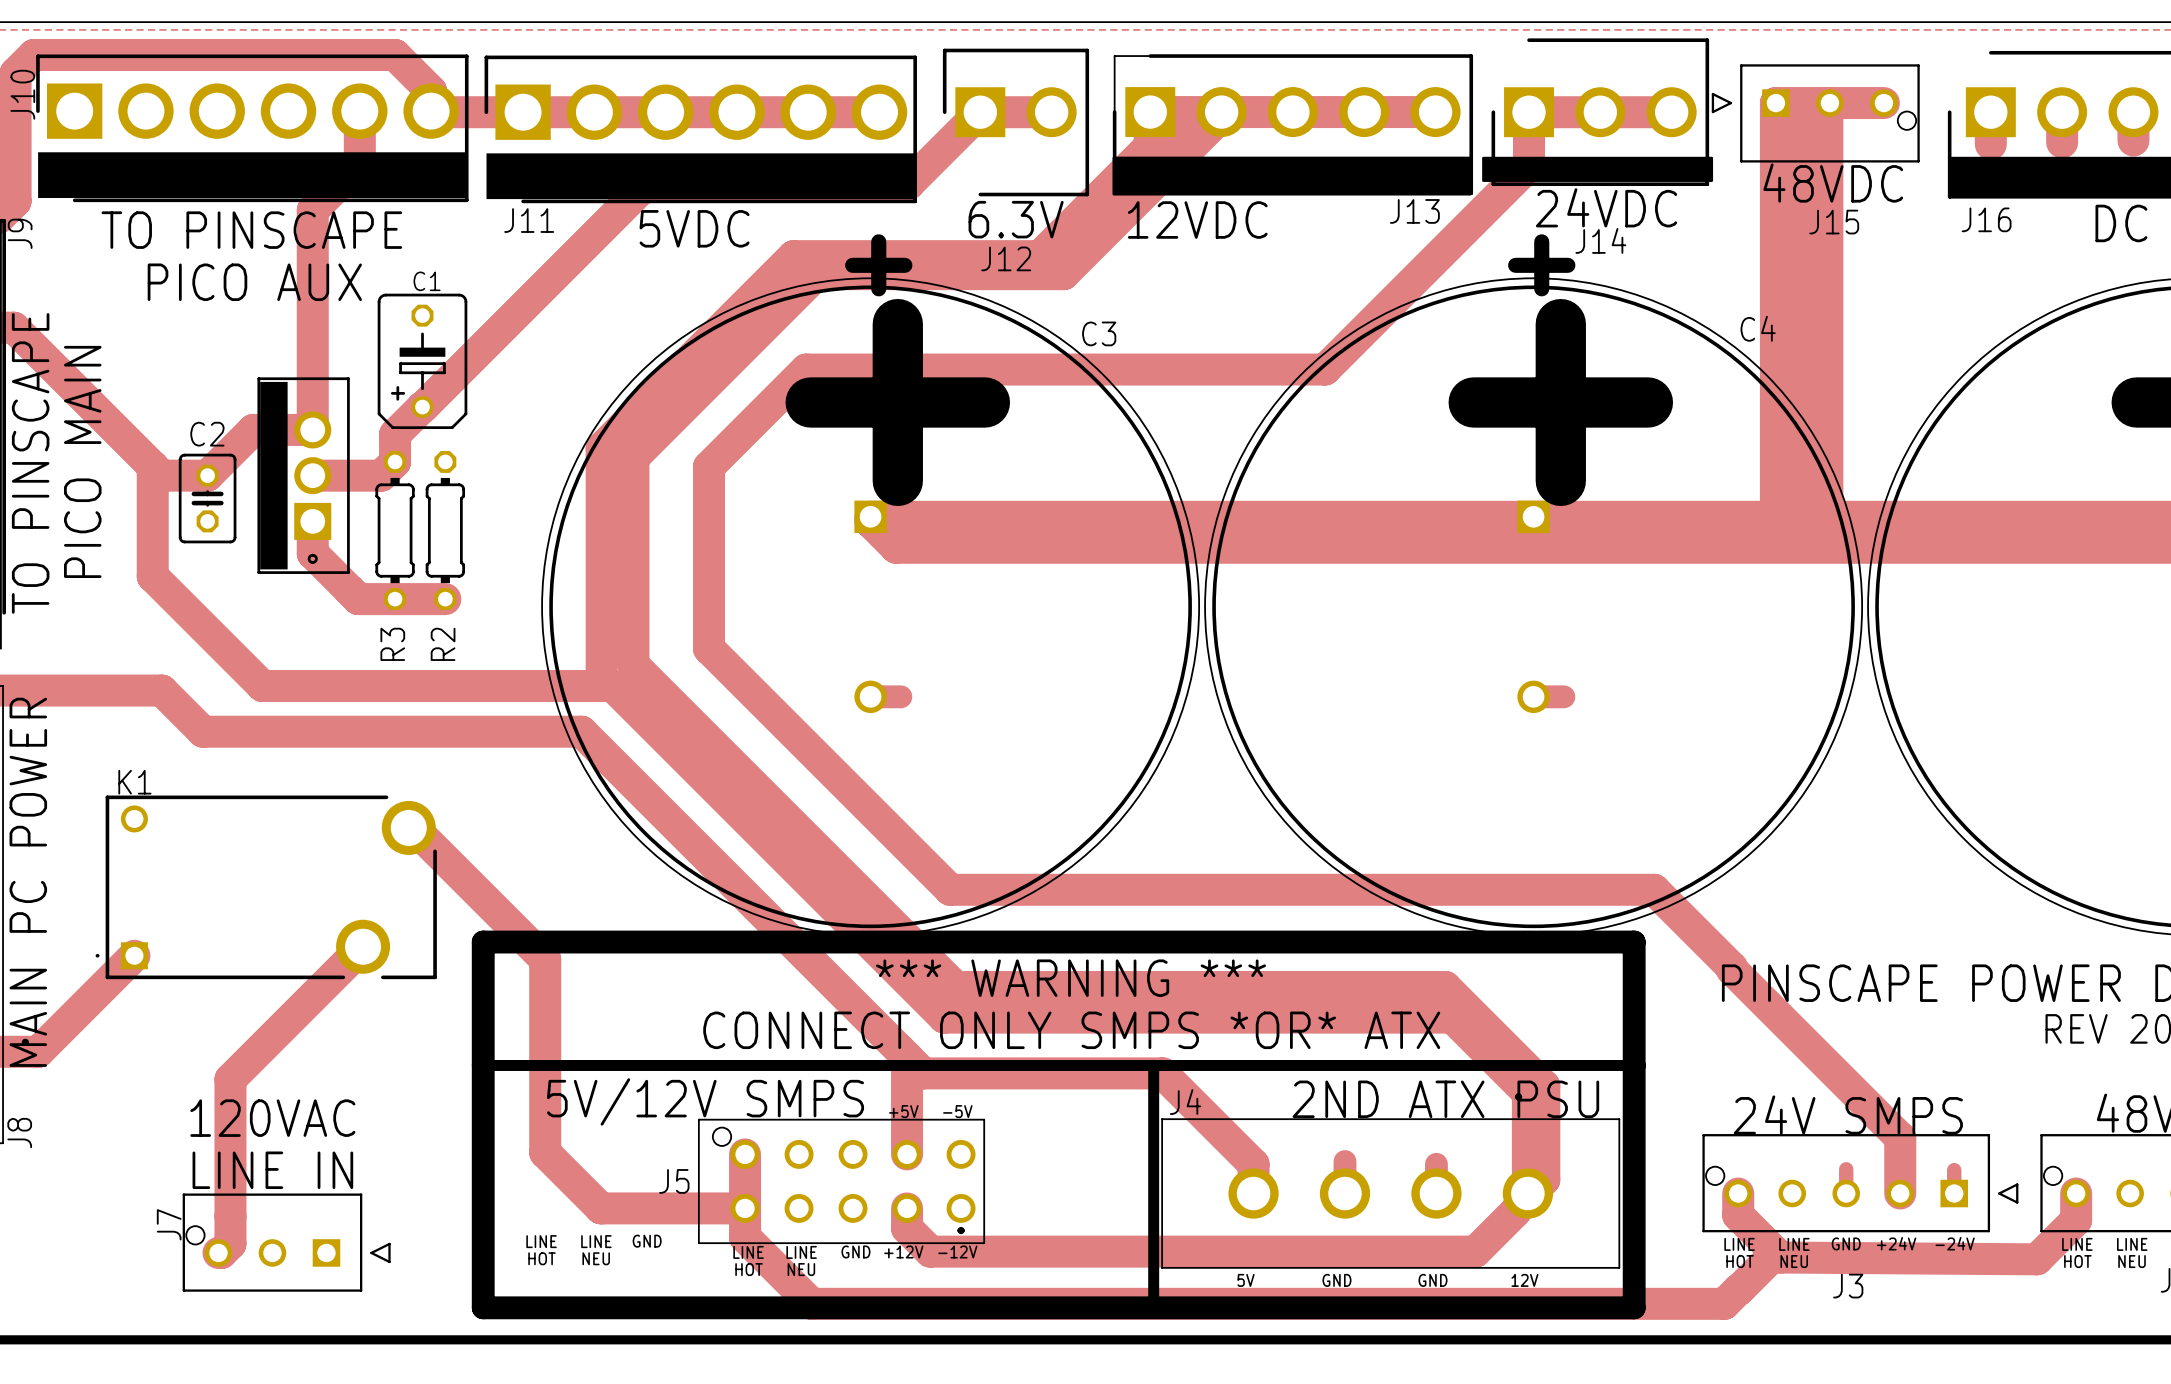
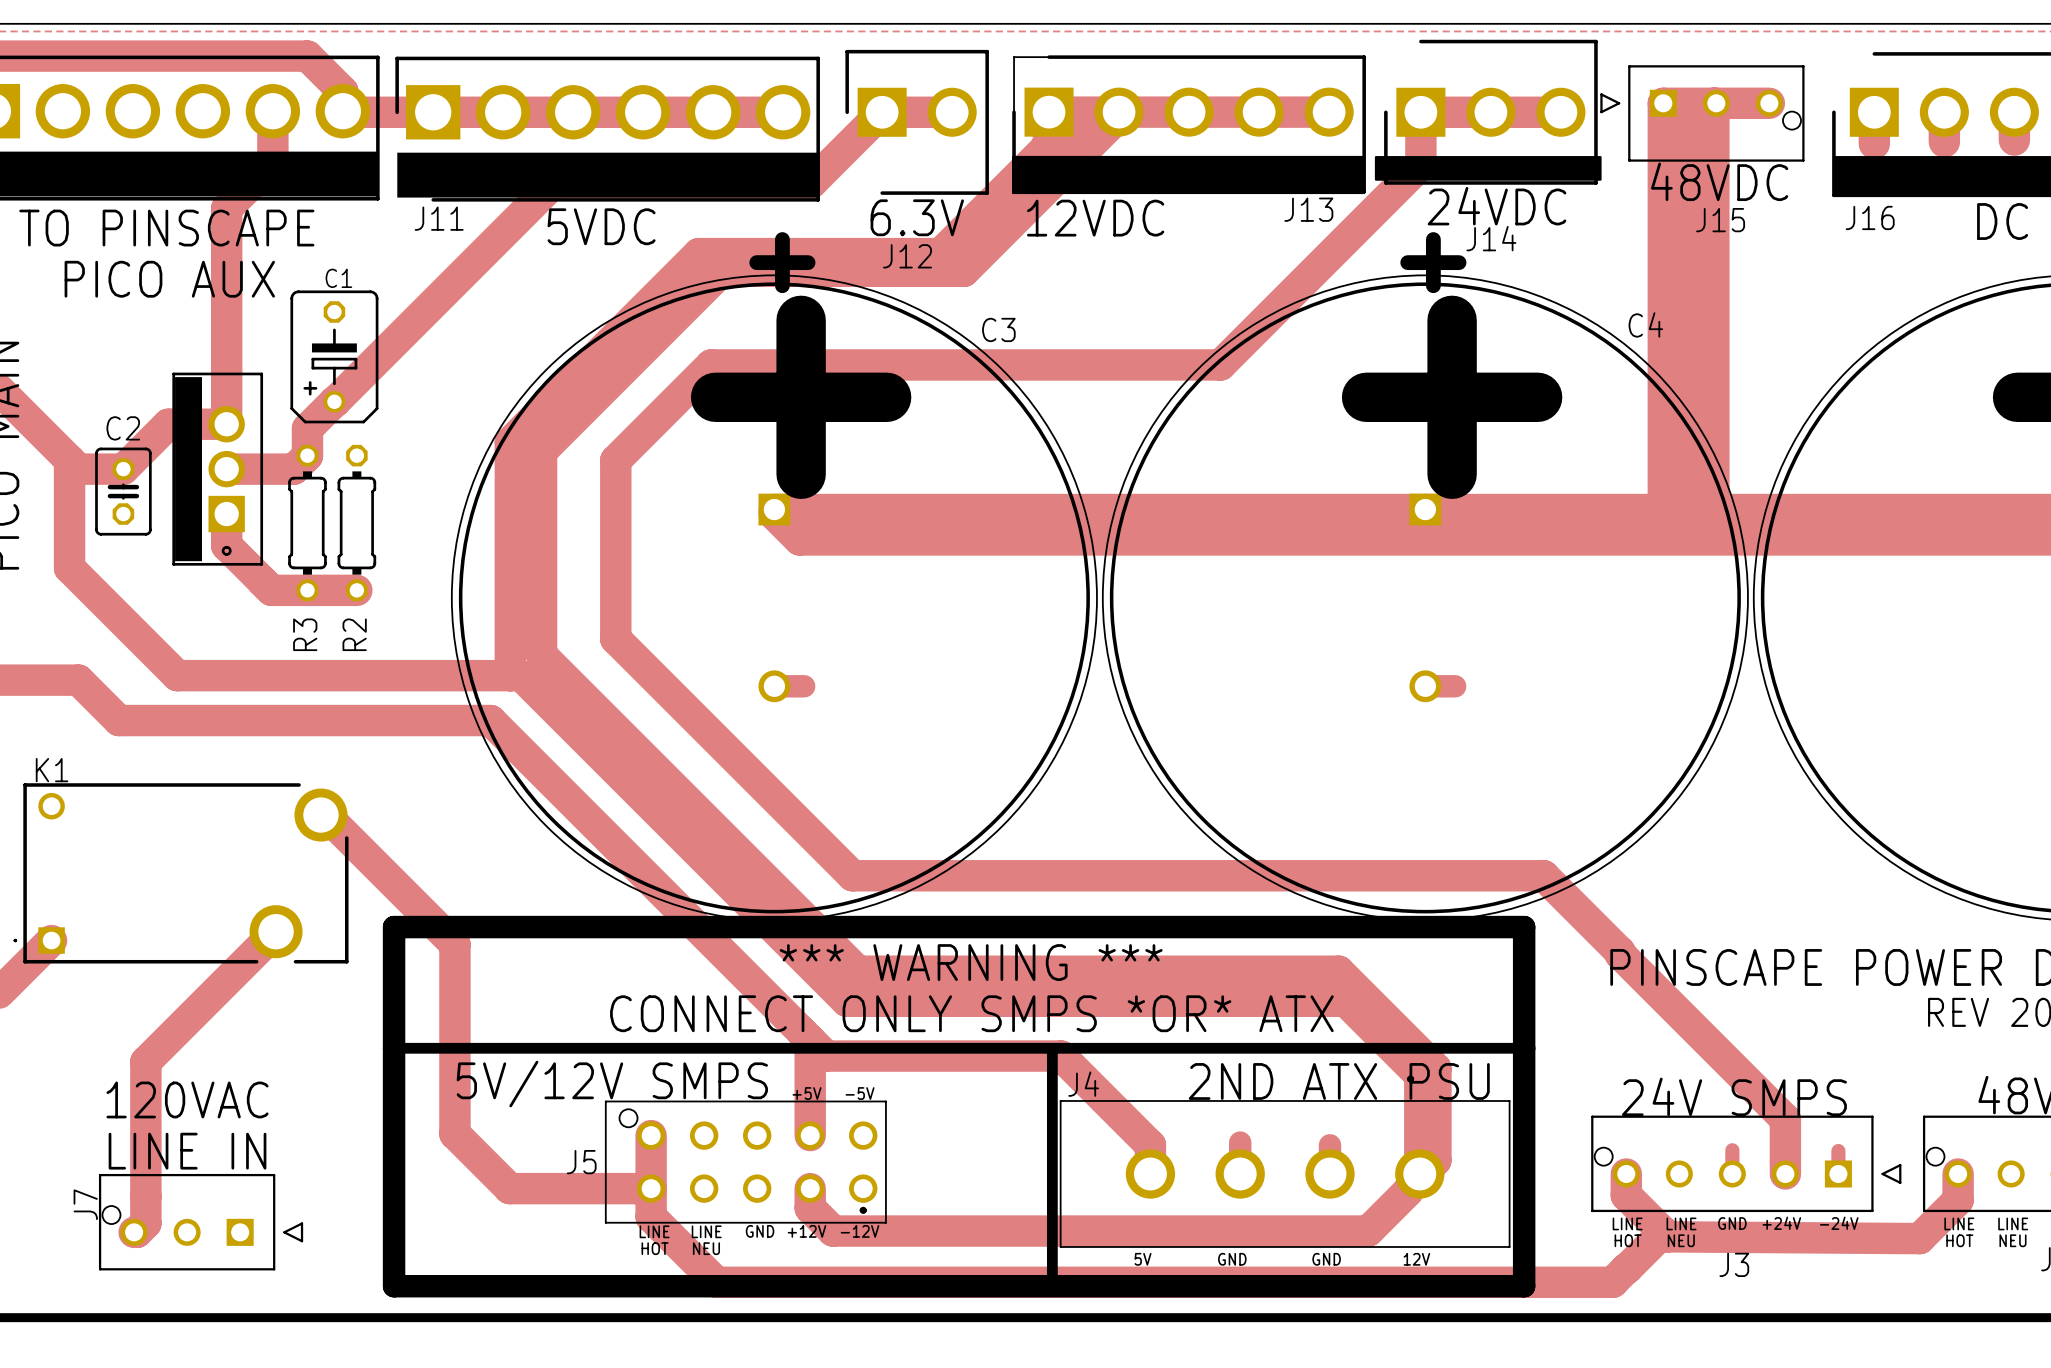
text: LINE (541, 1241) -> none
text: LINE (596, 1241) -> none
text: GND (647, 1241) -> none
text: HOT (542, 1258) -> none
text: NEU (596, 1258) -> none

